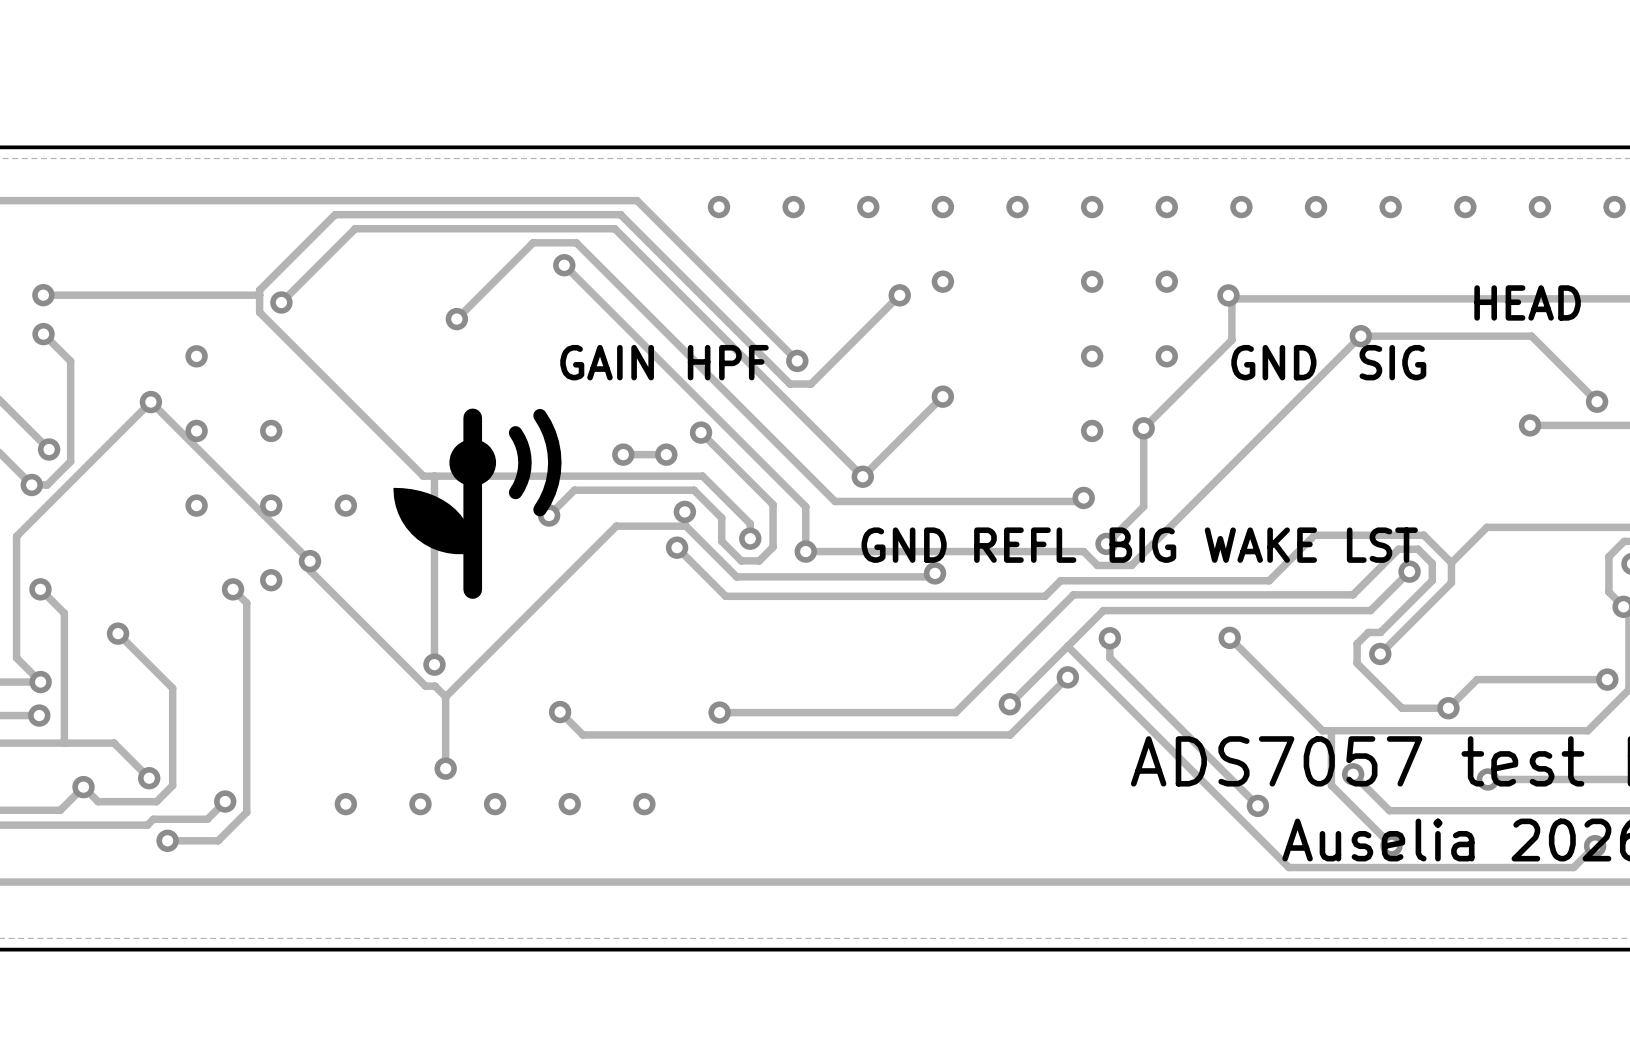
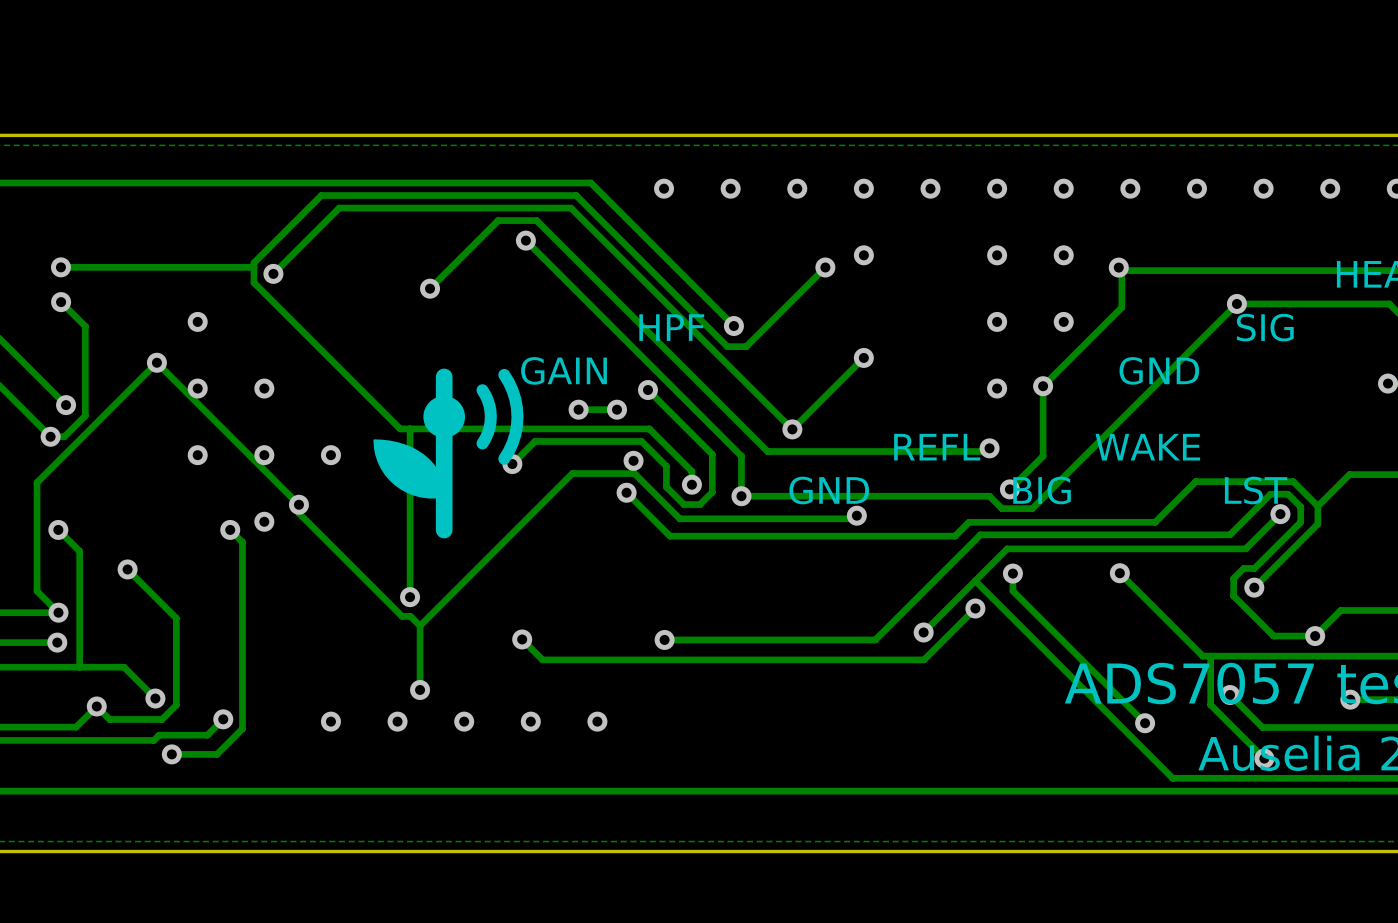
text position: GAIN (607, 362) -> GAIN (564, 370)
text position: GND (1273, 362) -> GND (1159, 370)
text position: REFL (1025, 545) -> REFL (937, 447)
text position: WAKE (1260, 545) -> WAKE (1147, 447)

